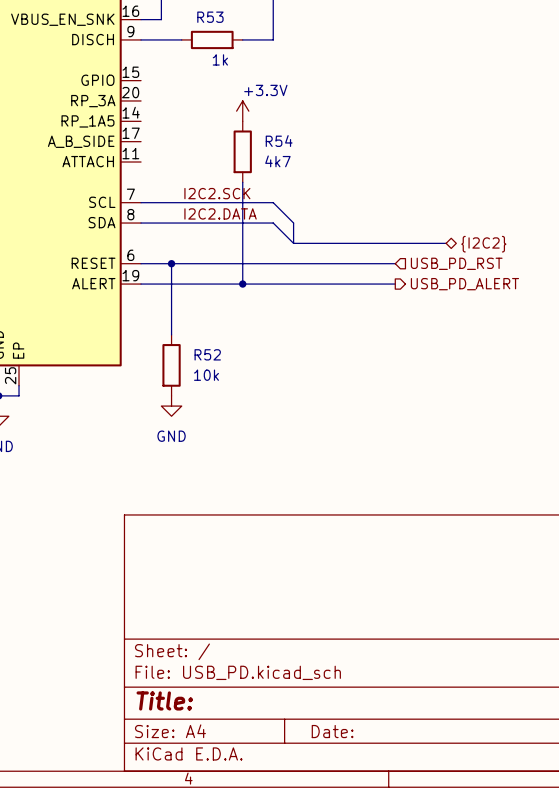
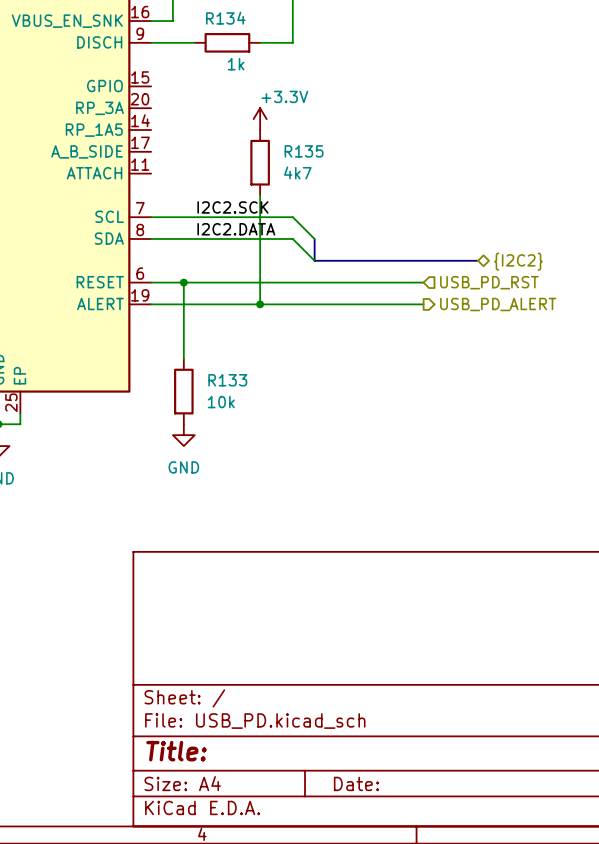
R53 name: R53 (210, 17) -> R134 (225, 18)
R54 name: R54 (279, 141) -> R135 (304, 151)
R52 name: R52 (207, 354) -> R133 (227, 380)

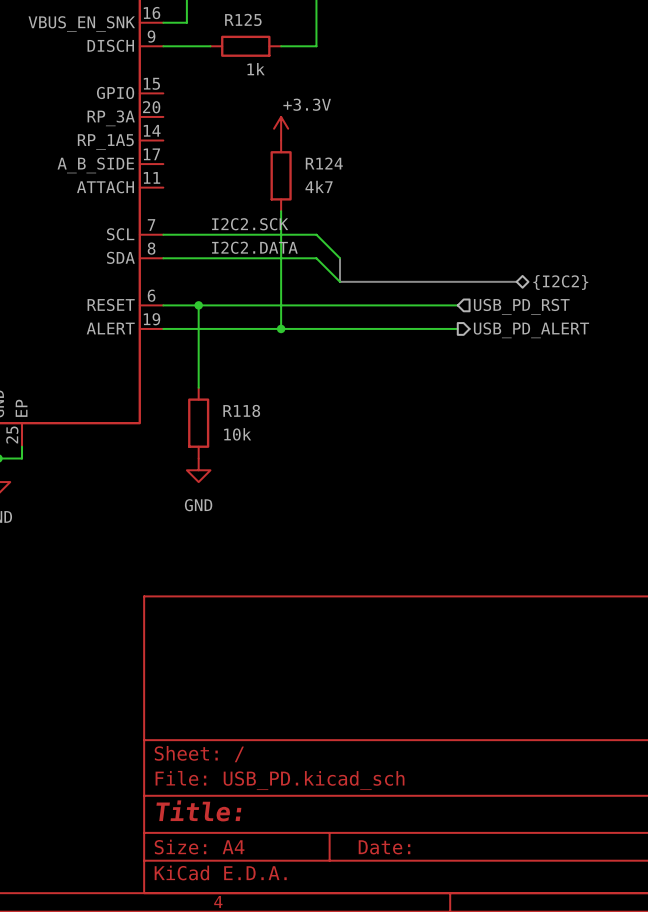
R134 name: R134 (225, 18) -> R125 (243, 19)
R135 name: R135 (304, 151) -> R124 (324, 163)
R133 name: R133 (227, 380) -> R118 (241, 410)

